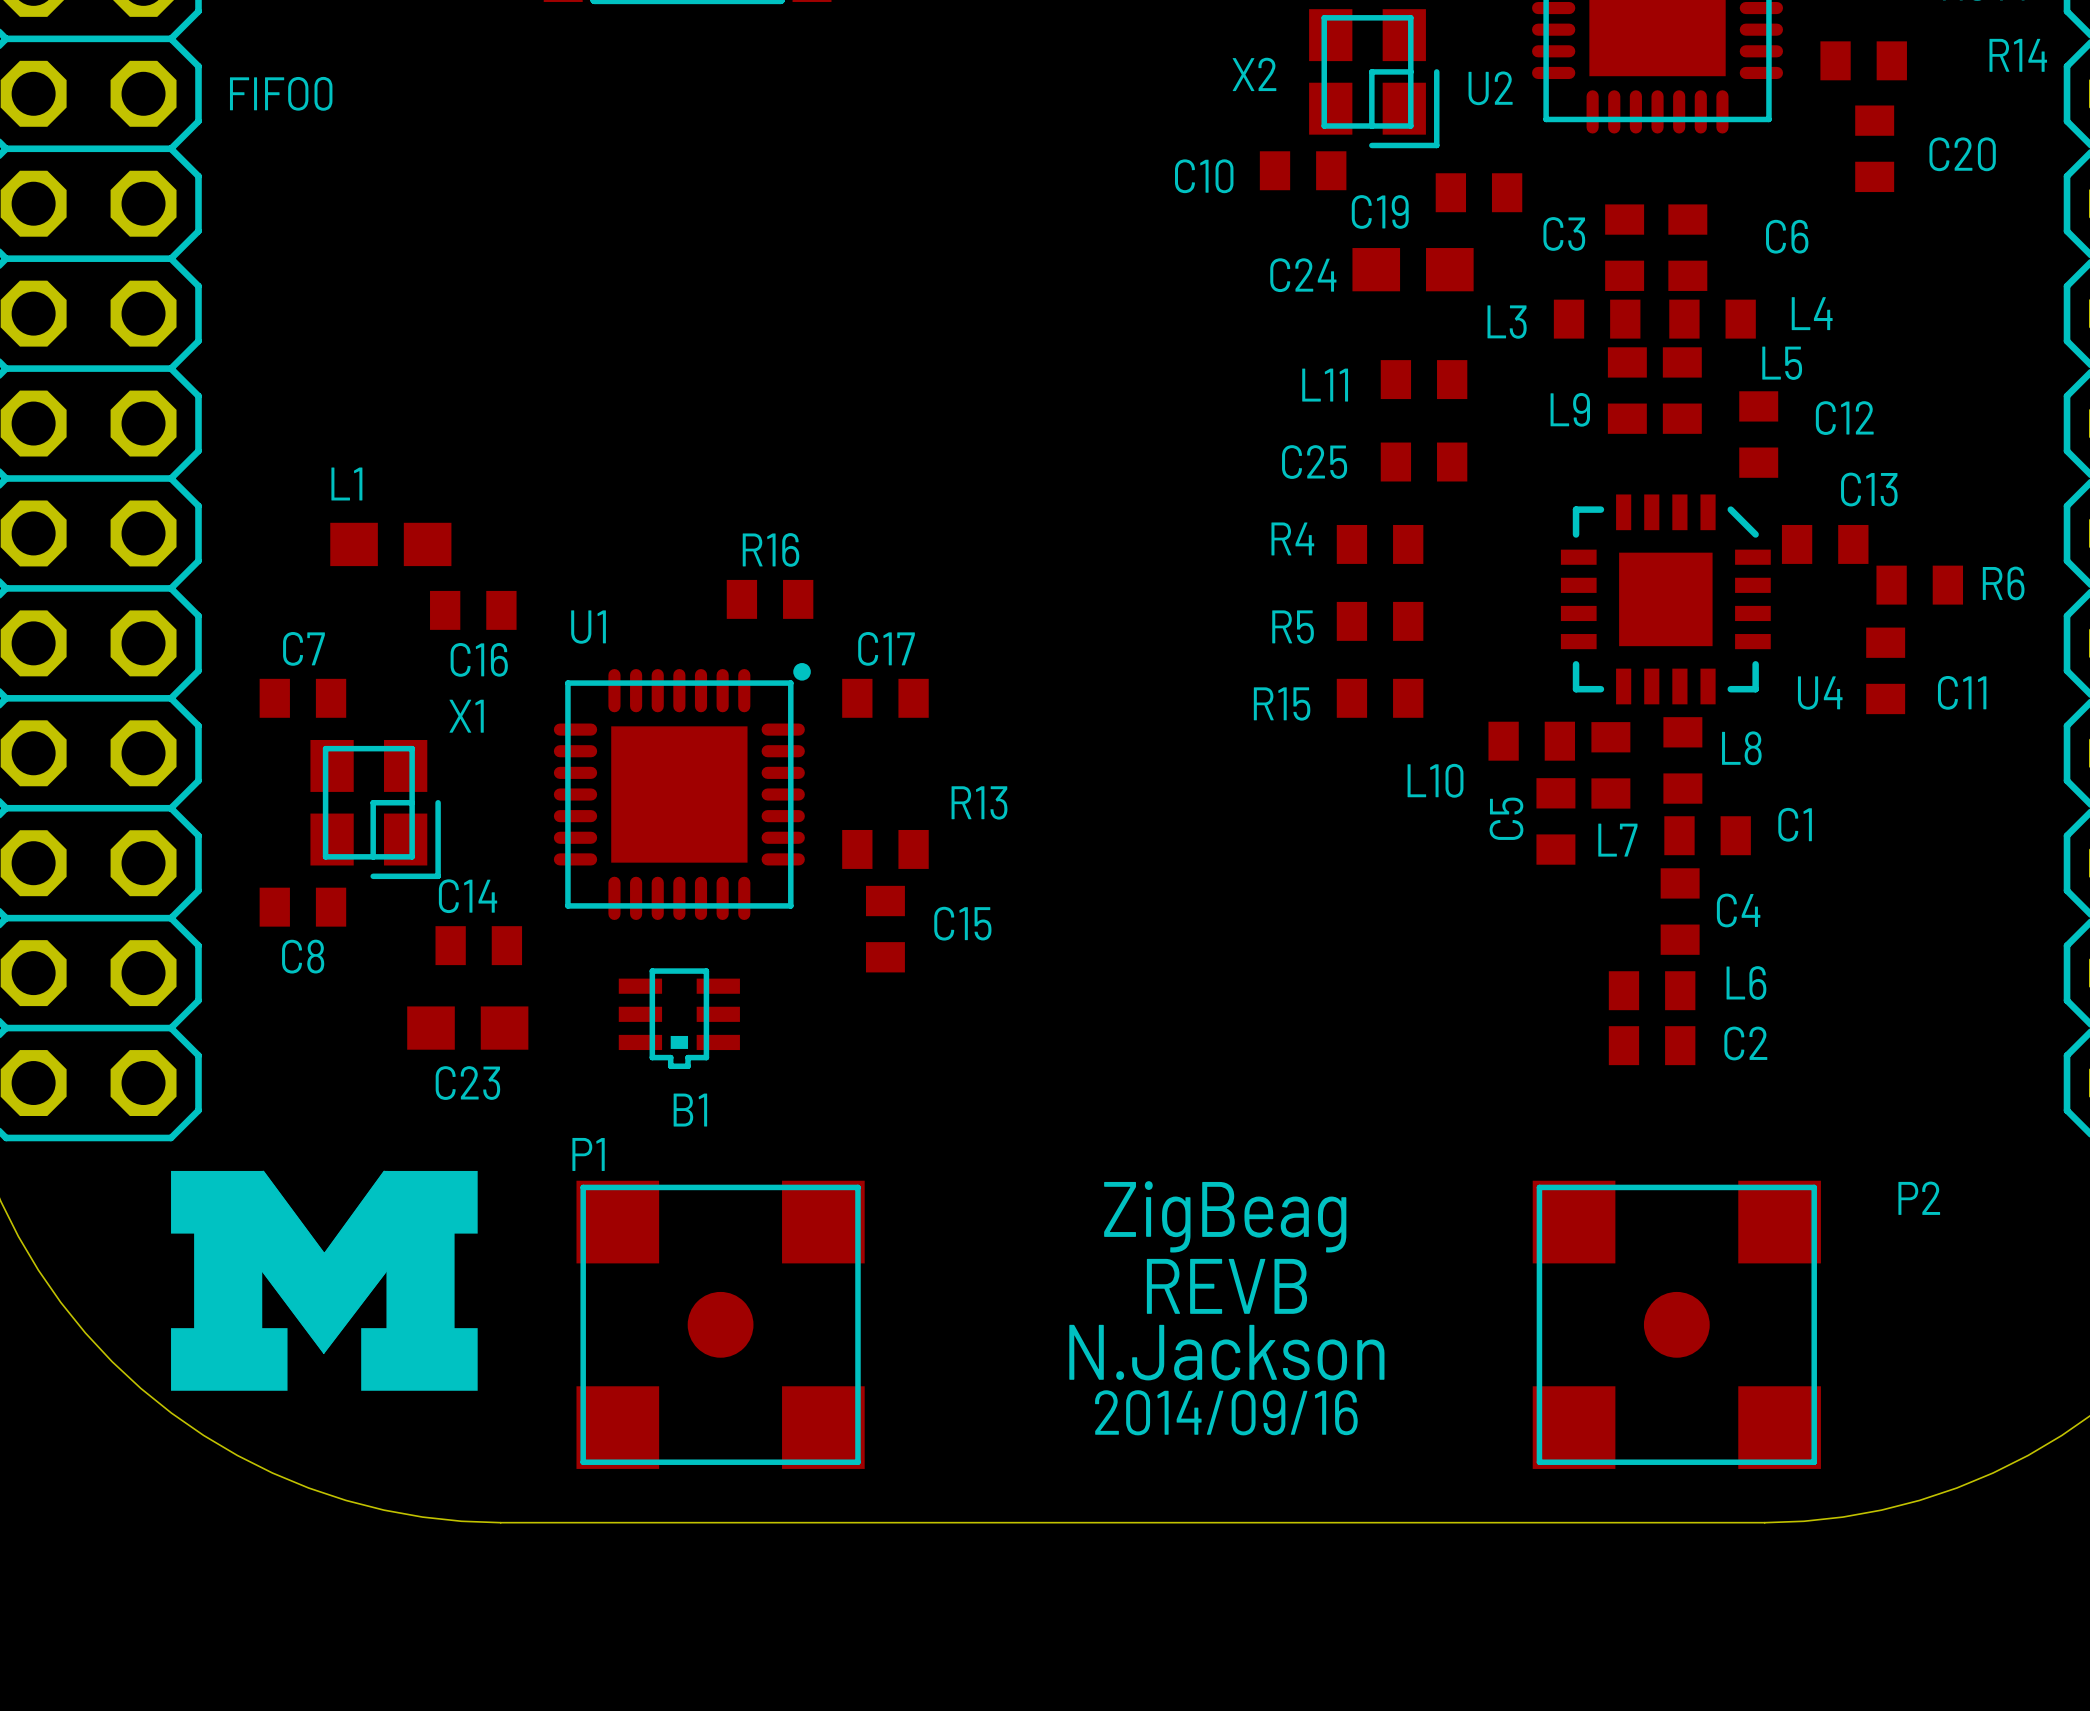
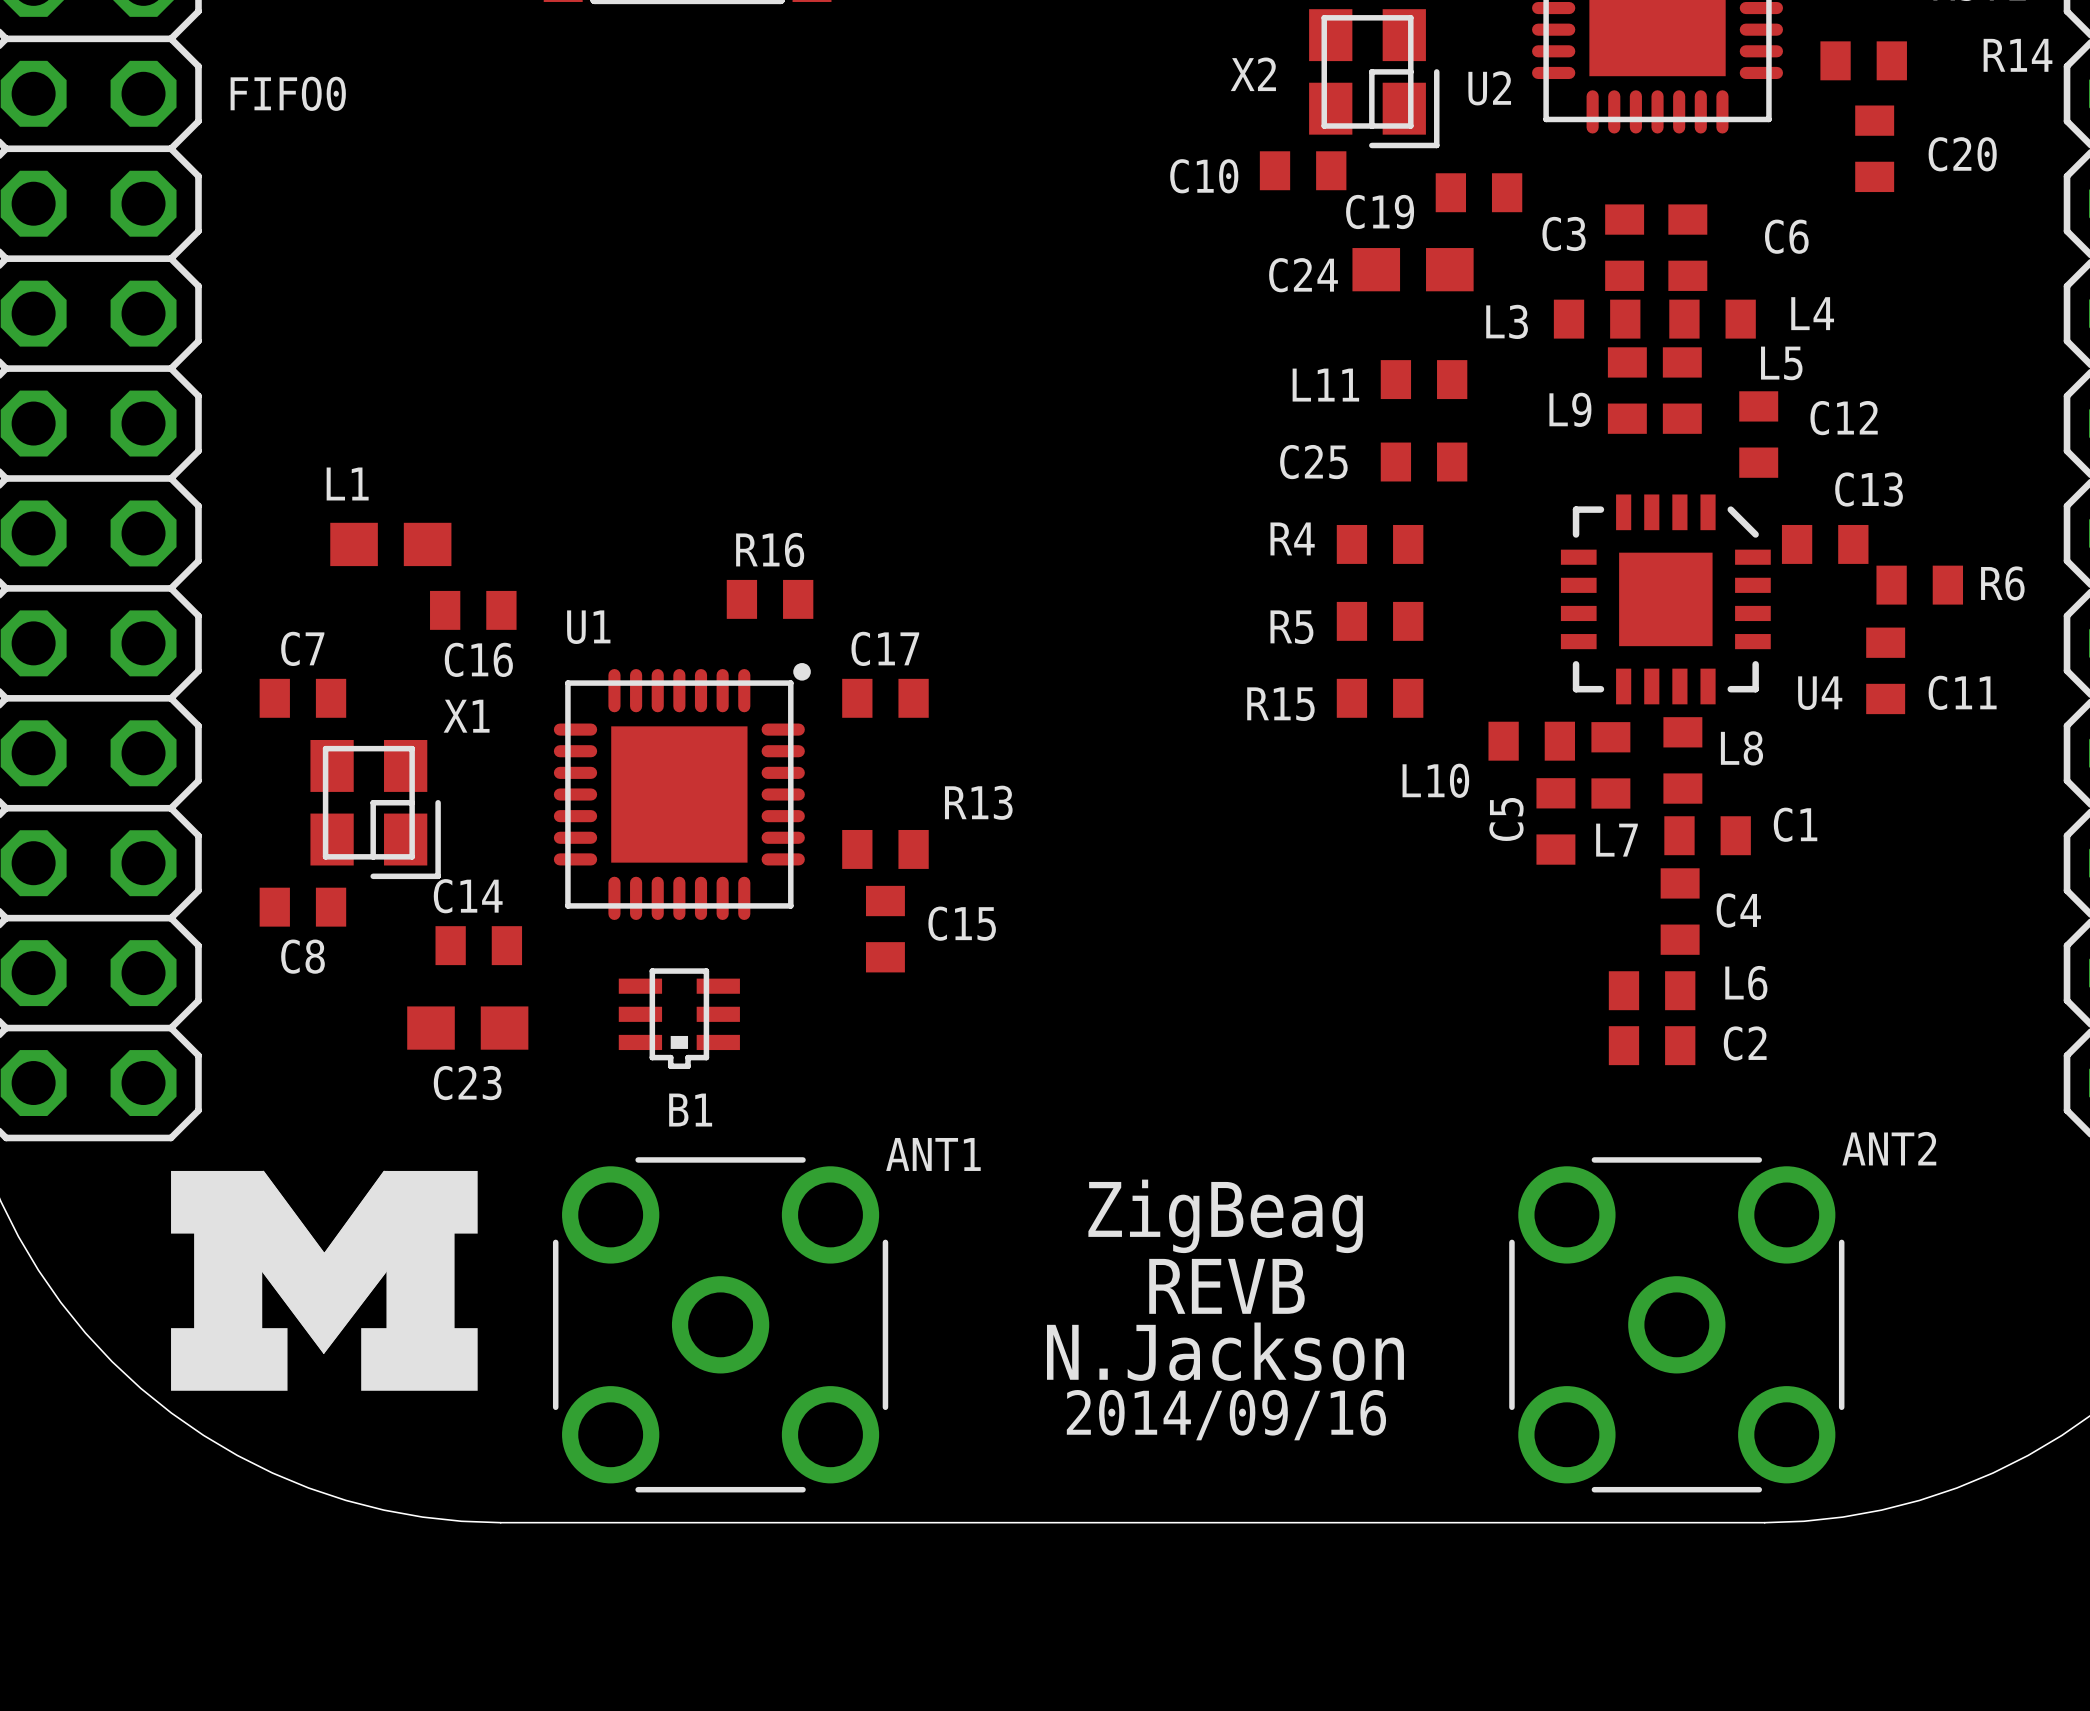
P1: (720, 1324) -> none
ANT1: none -> (720, 1324)
P2: (1676, 1324) -> none
ANT2: none -> (1676, 1324)

